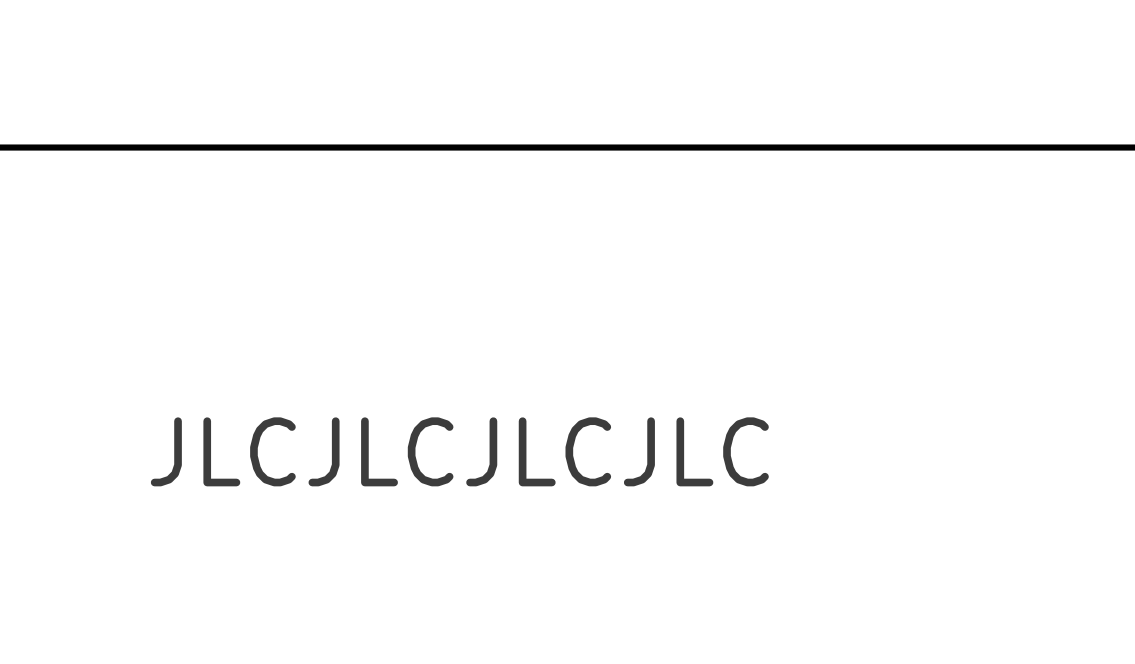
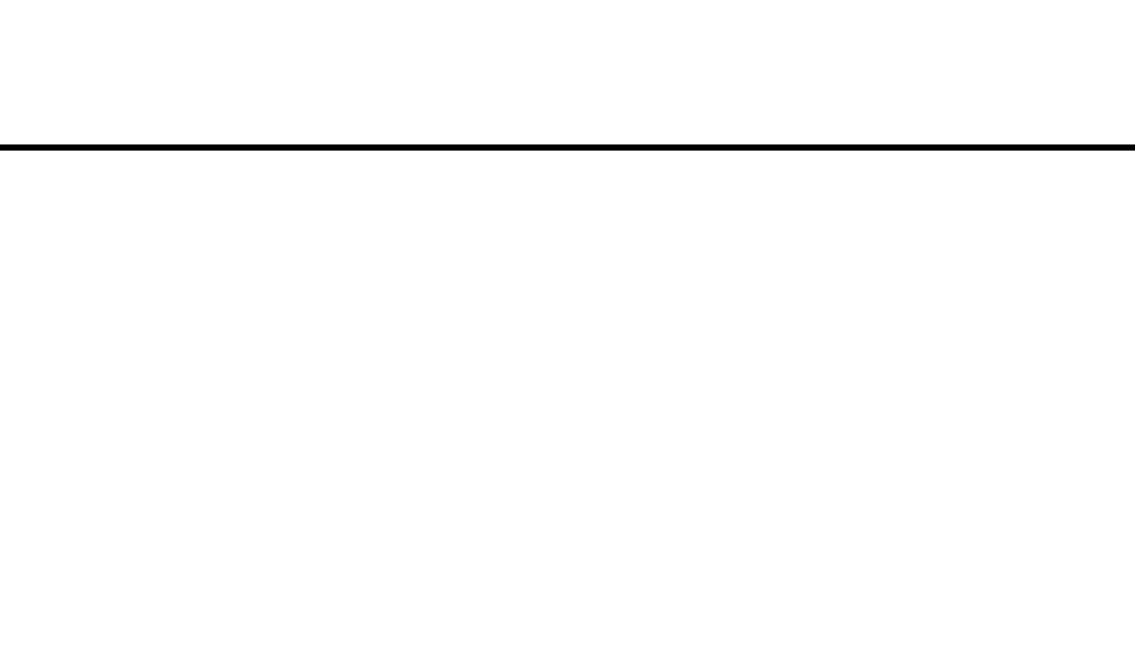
text: JLCJLCJLCJLC (459, 451) -> none

